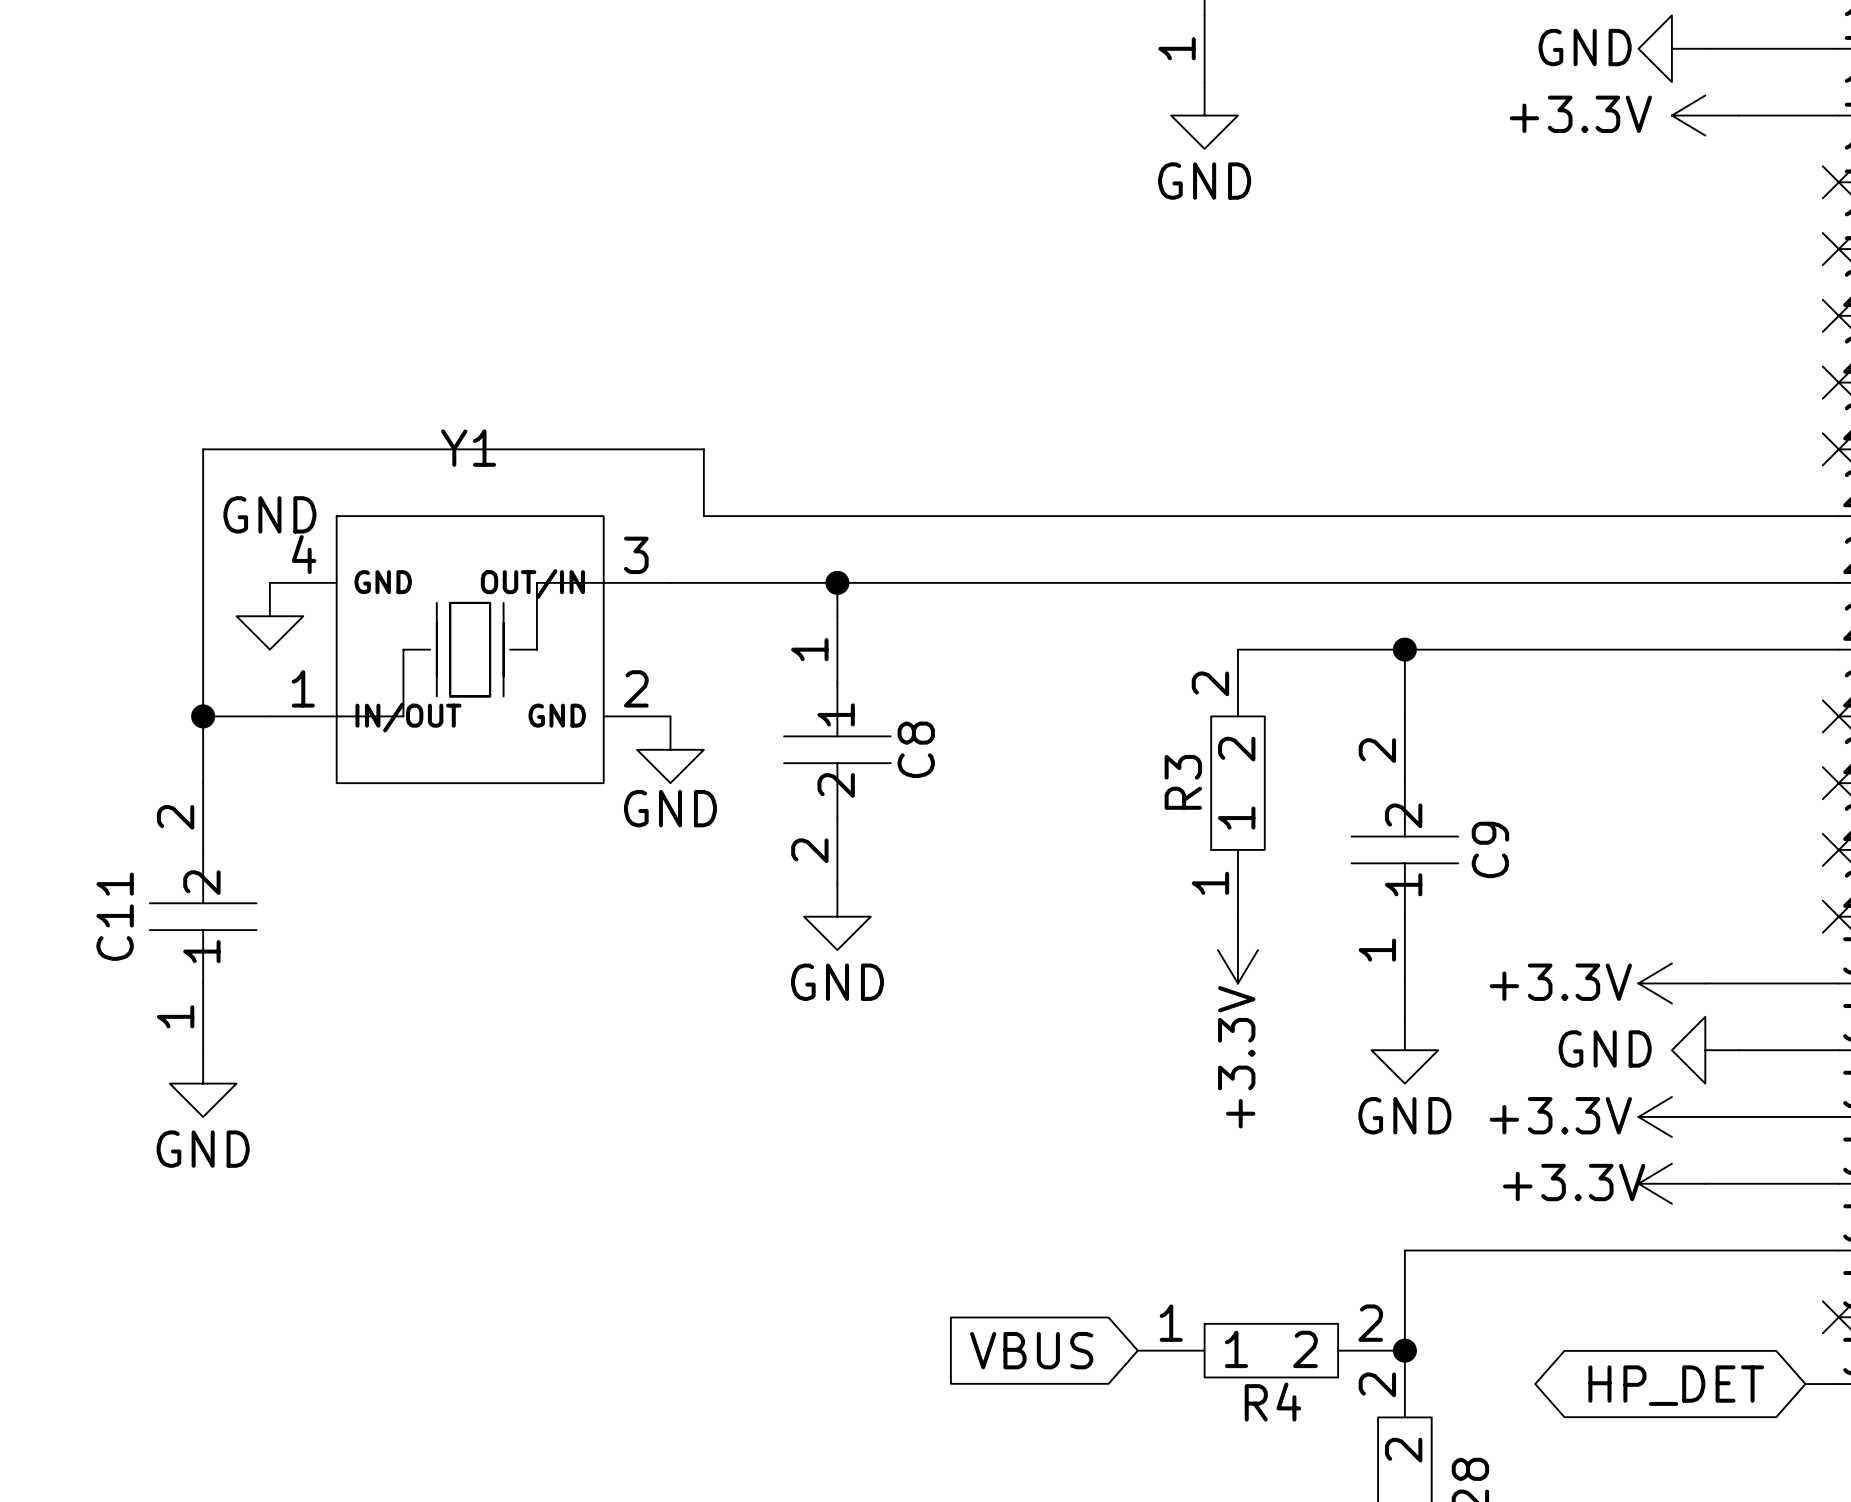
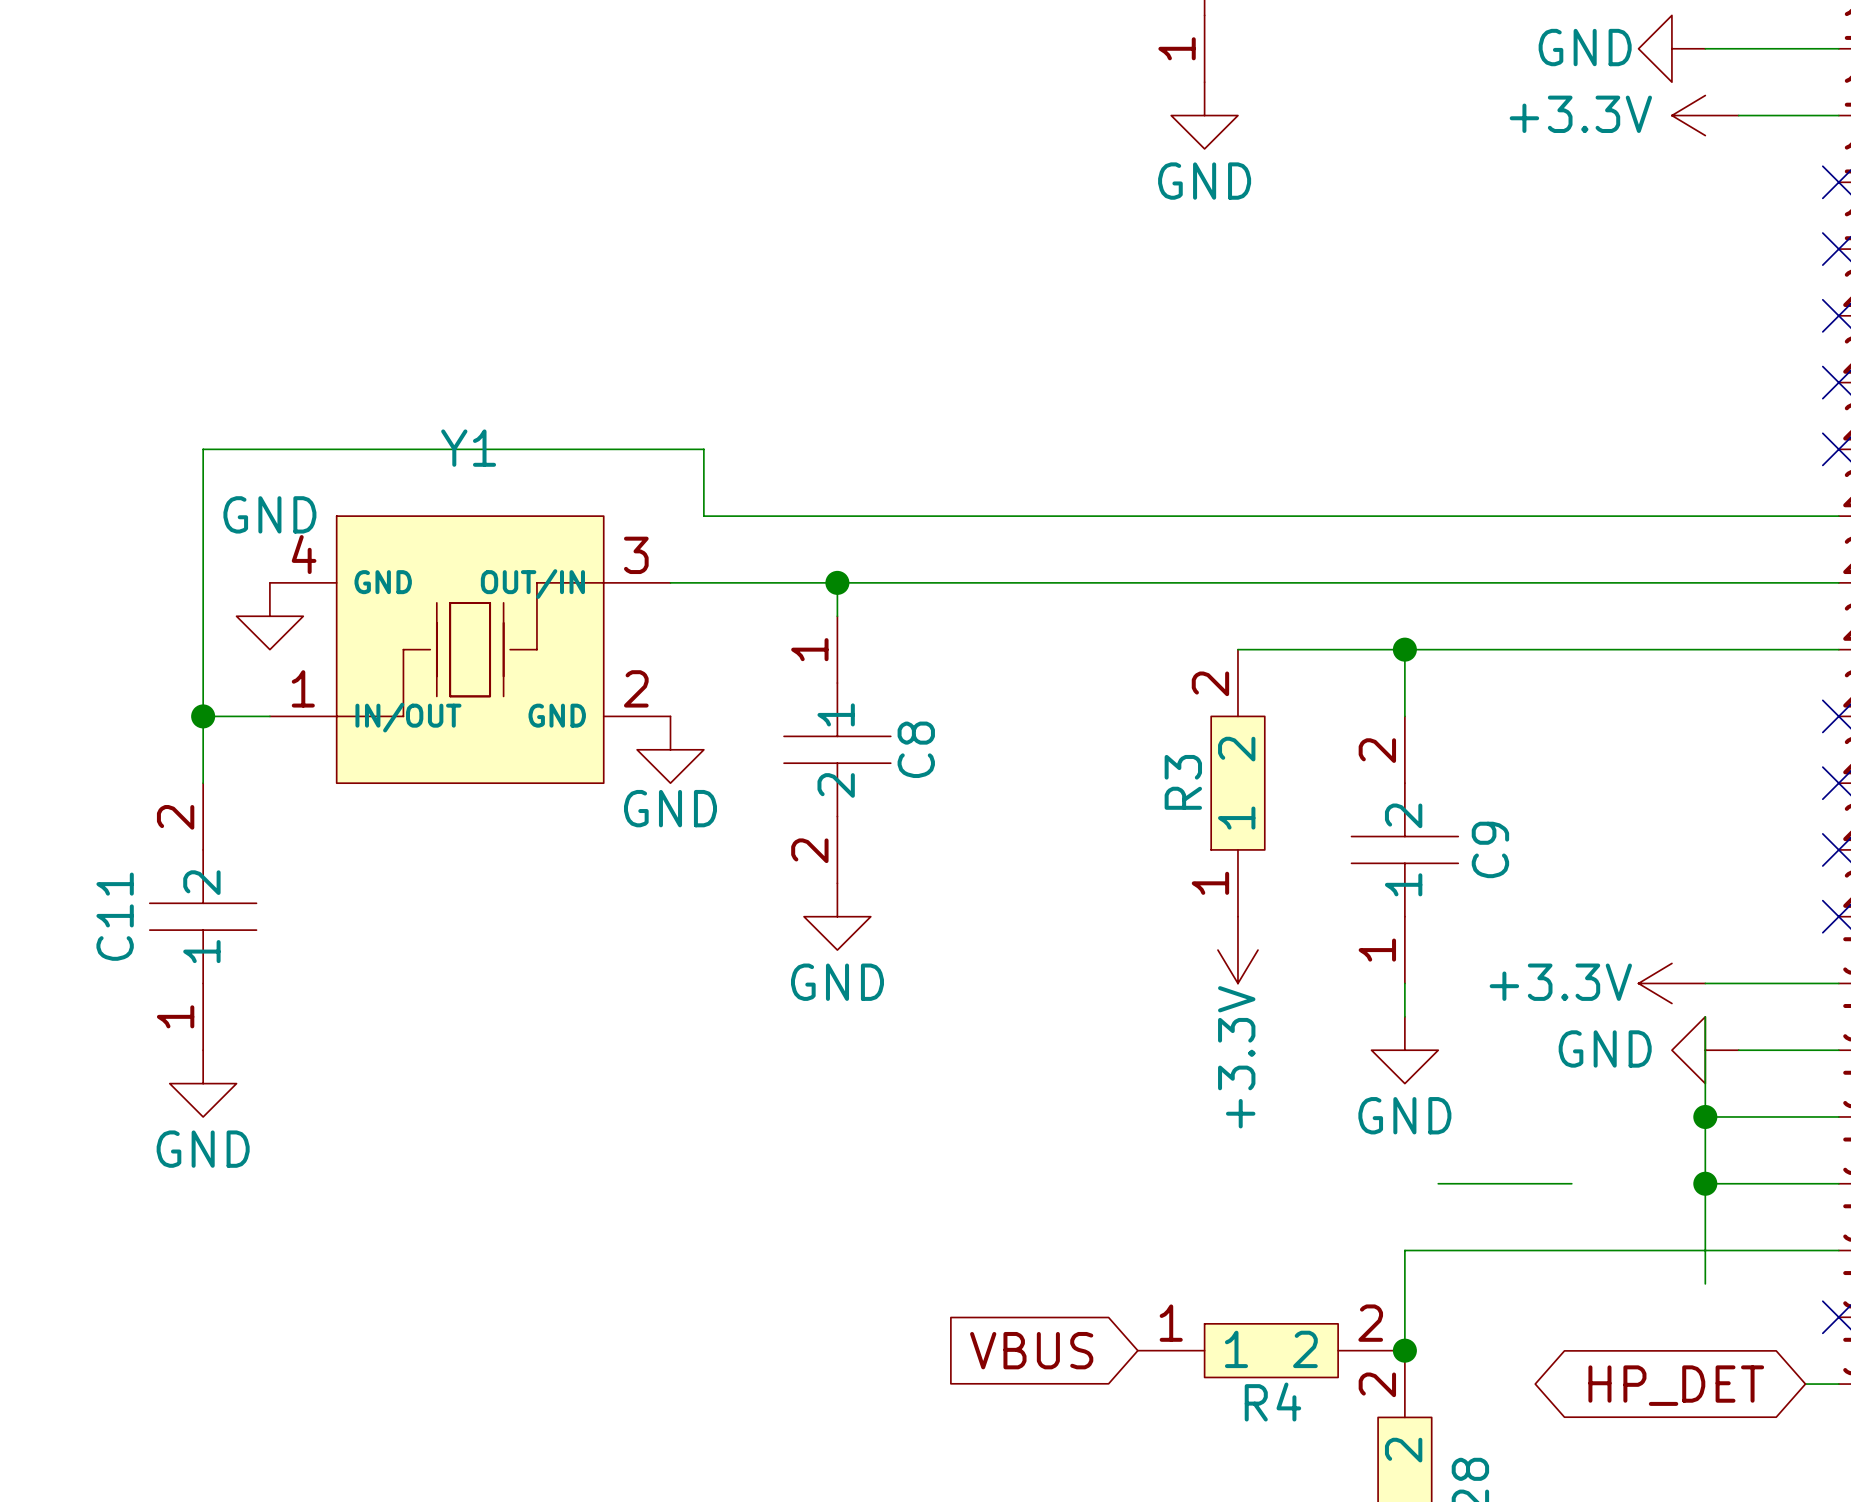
wire: none -> (1705, 1016) (1705, 1283)
power symbol: +3.3V (1671, 1116) -> none
junction: none -> (1705, 1116)
wire: none -> (1438, 1183) (1571, 1183)
power symbol: +3.3V (1671, 1183) -> none
junction: none -> (1705, 1183)

